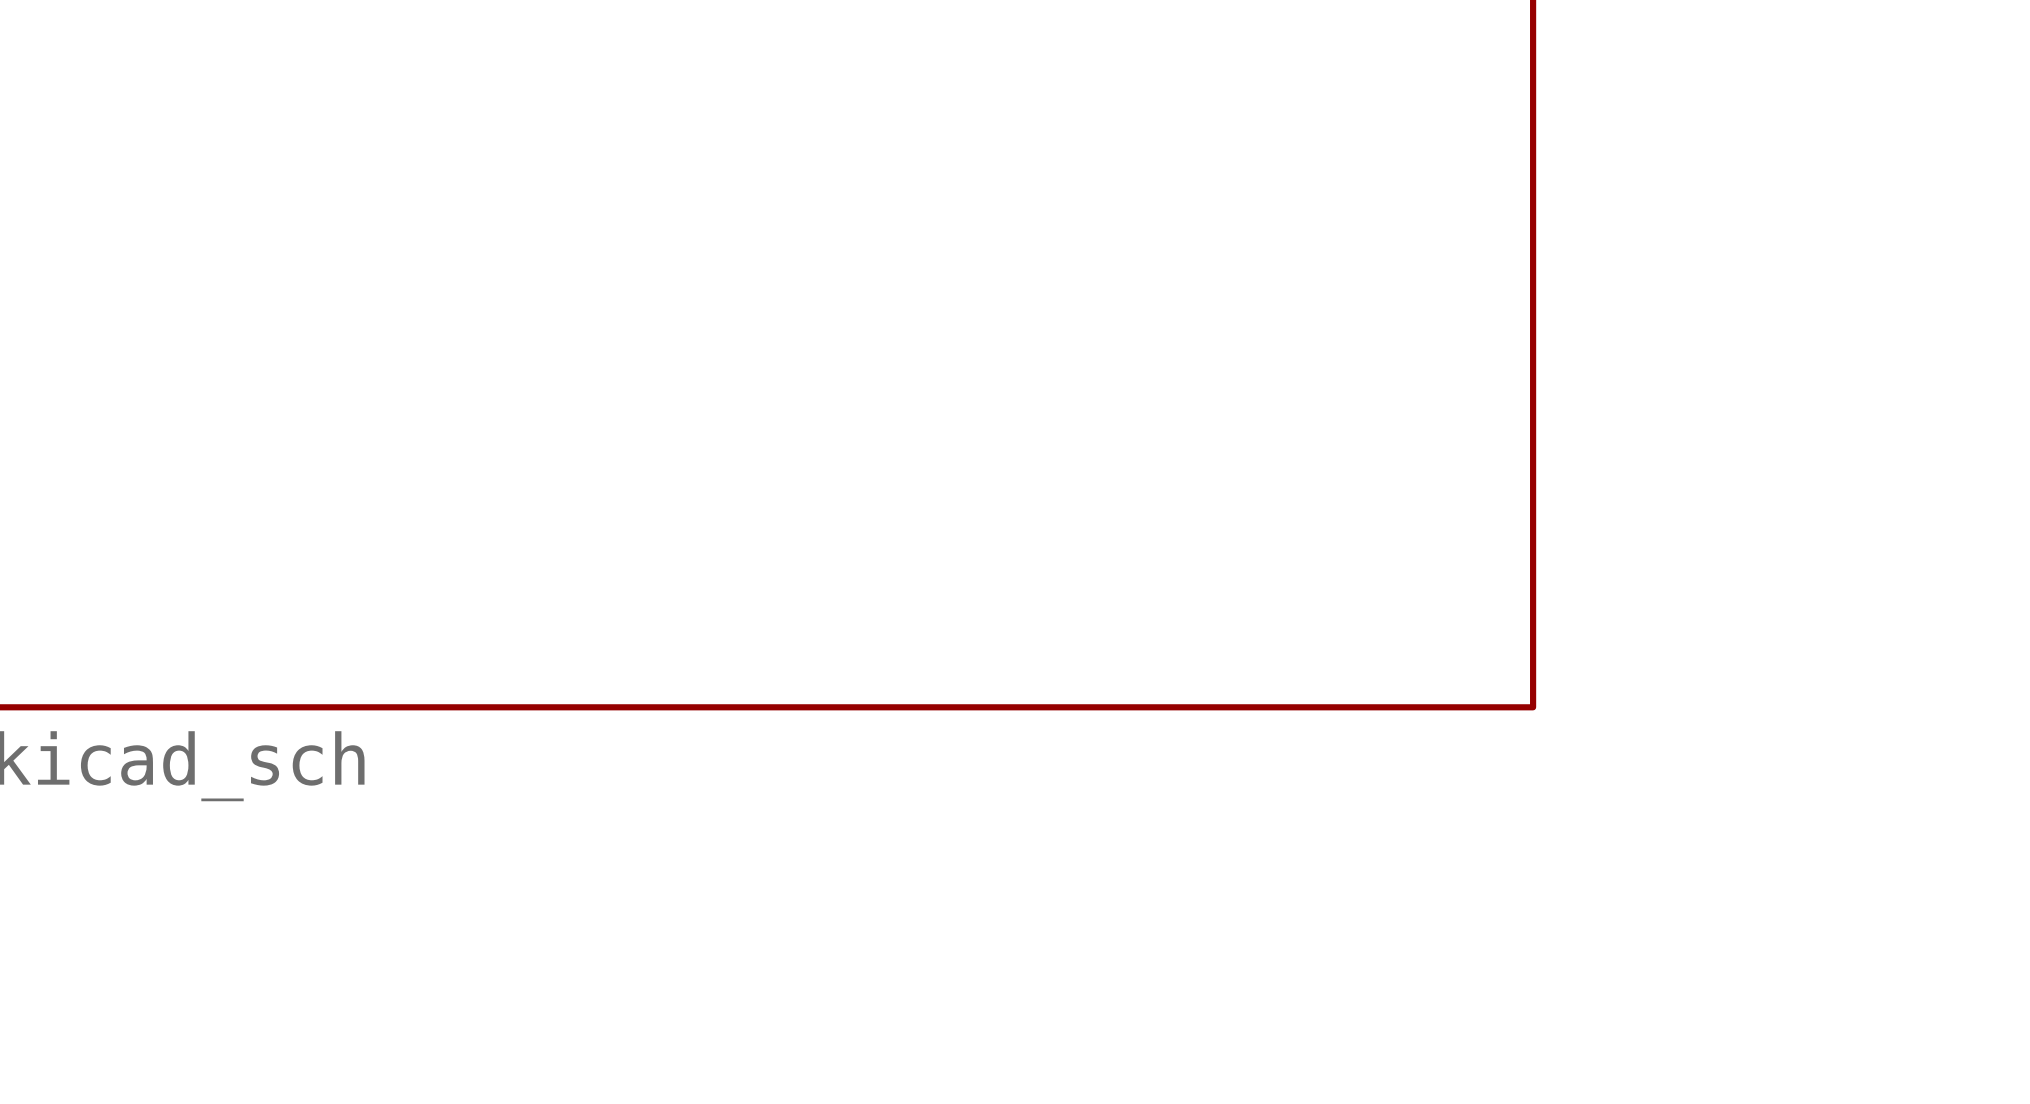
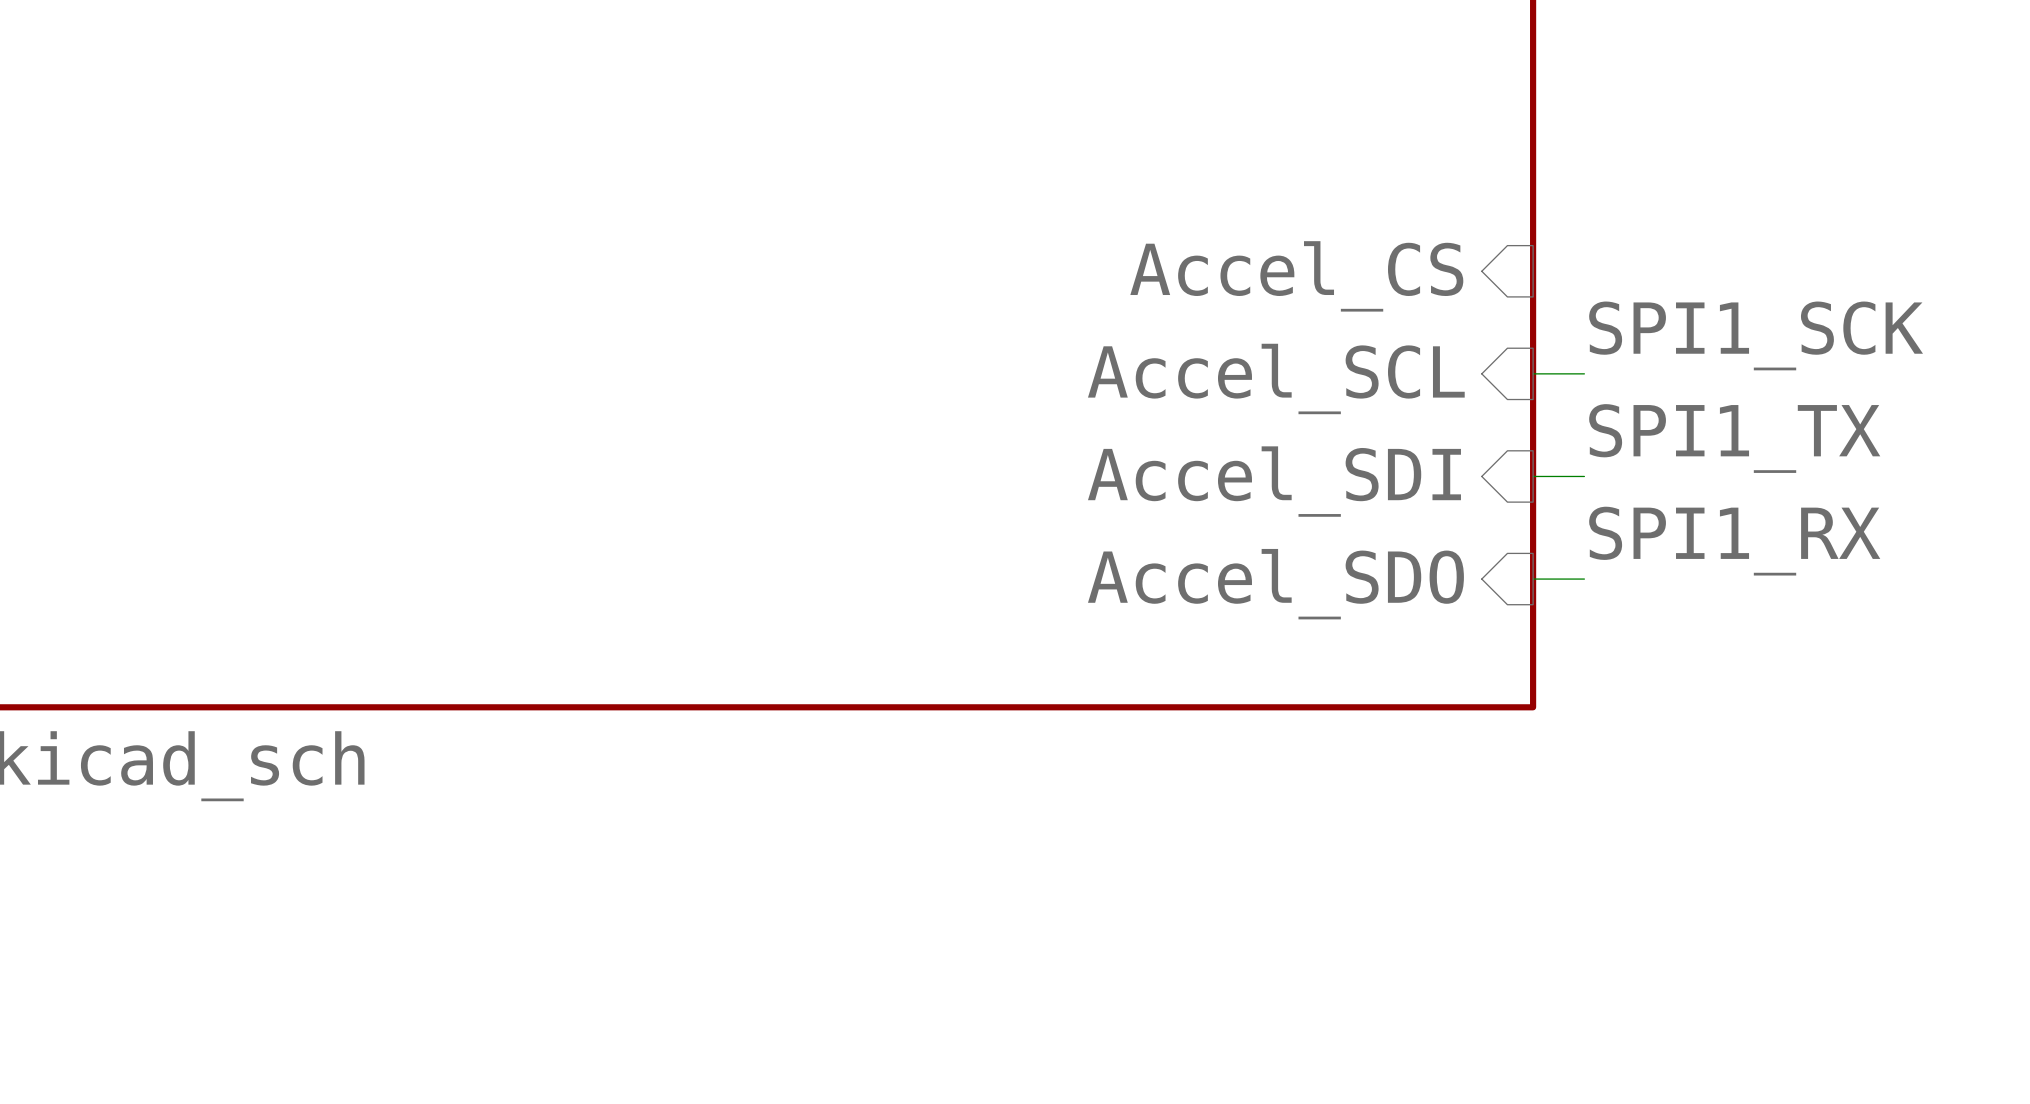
sheet pin: none -> Accel_CS (1296, 276)
label: none -> SPI1_SCK (1756, 335)
wire: none -> (1533, 373) (1584, 373)
sheet pin: none -> Accel_SCL (1276, 378)
label: none -> SPI1_TX (1734, 438)
wire: none -> (1533, 476) (1584, 476)
sheet pin: none -> Accel_SDI (1274, 481)
label: none -> SPI1_RX (1734, 541)
wire: none -> (1533, 579) (1584, 579)
sheet pin: none -> Accel_SDO (1275, 584)

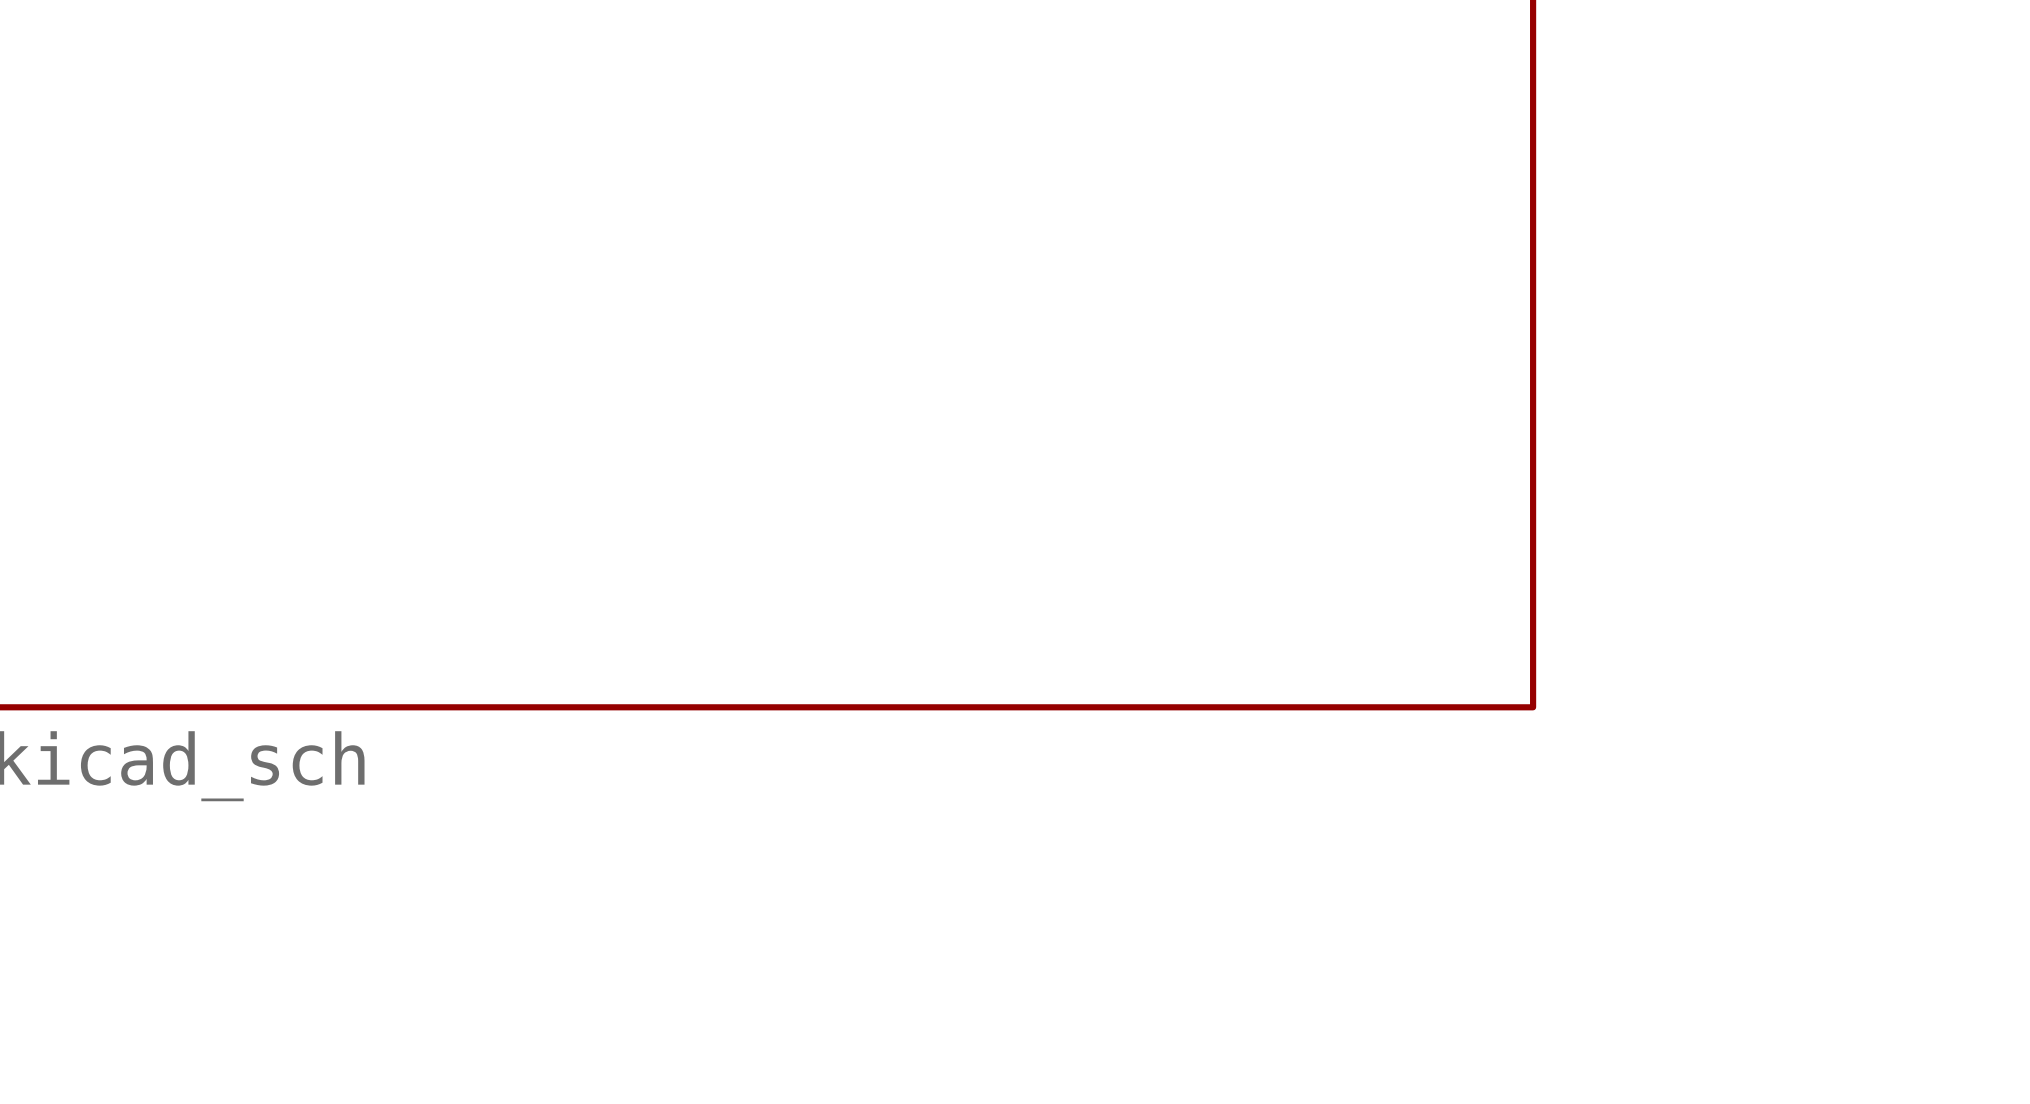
sheet pin: Accel_CS (1296, 276) -> none
label: SPI1_SCK (1756, 335) -> none
wire: (1533, 373) (1584, 373) -> none
sheet pin: Accel_SCL (1276, 378) -> none
label: SPI1_TX (1734, 438) -> none
wire: (1533, 476) (1584, 476) -> none
sheet pin: Accel_SDI (1274, 481) -> none
label: SPI1_RX (1734, 541) -> none
wire: (1533, 579) (1584, 579) -> none
sheet pin: Accel_SDO (1275, 584) -> none

